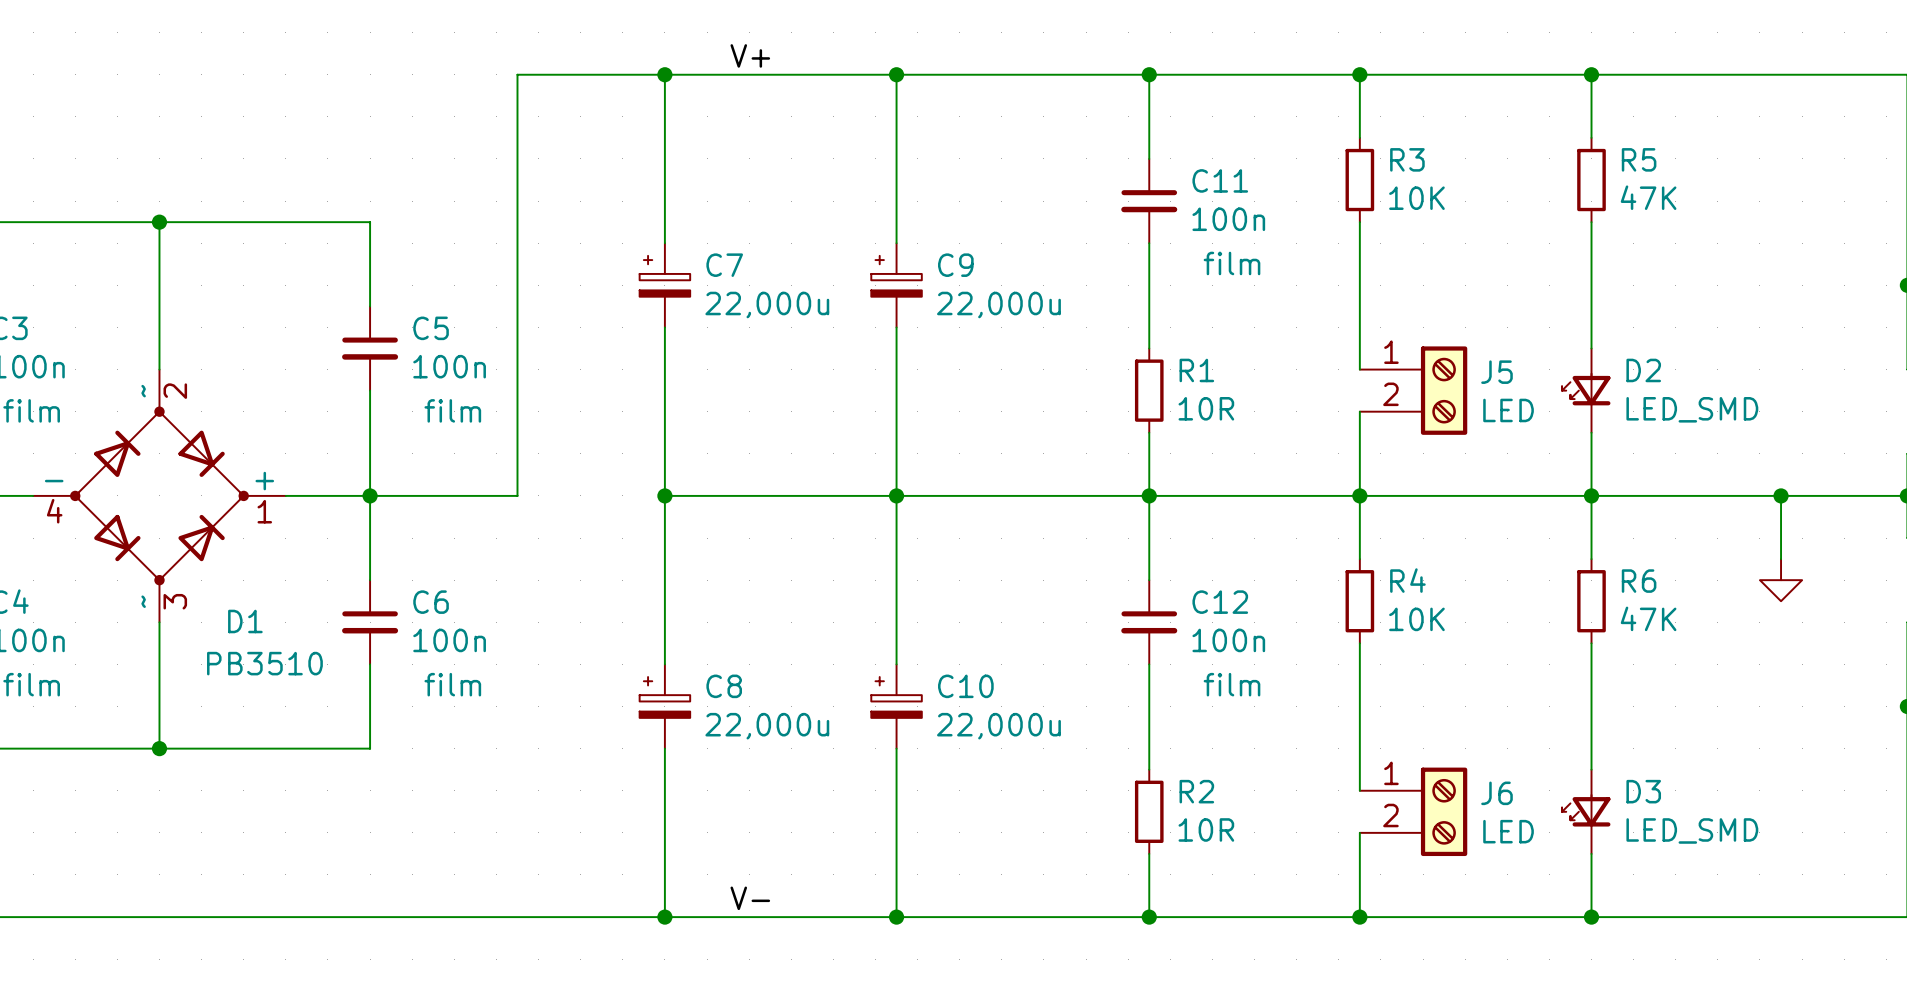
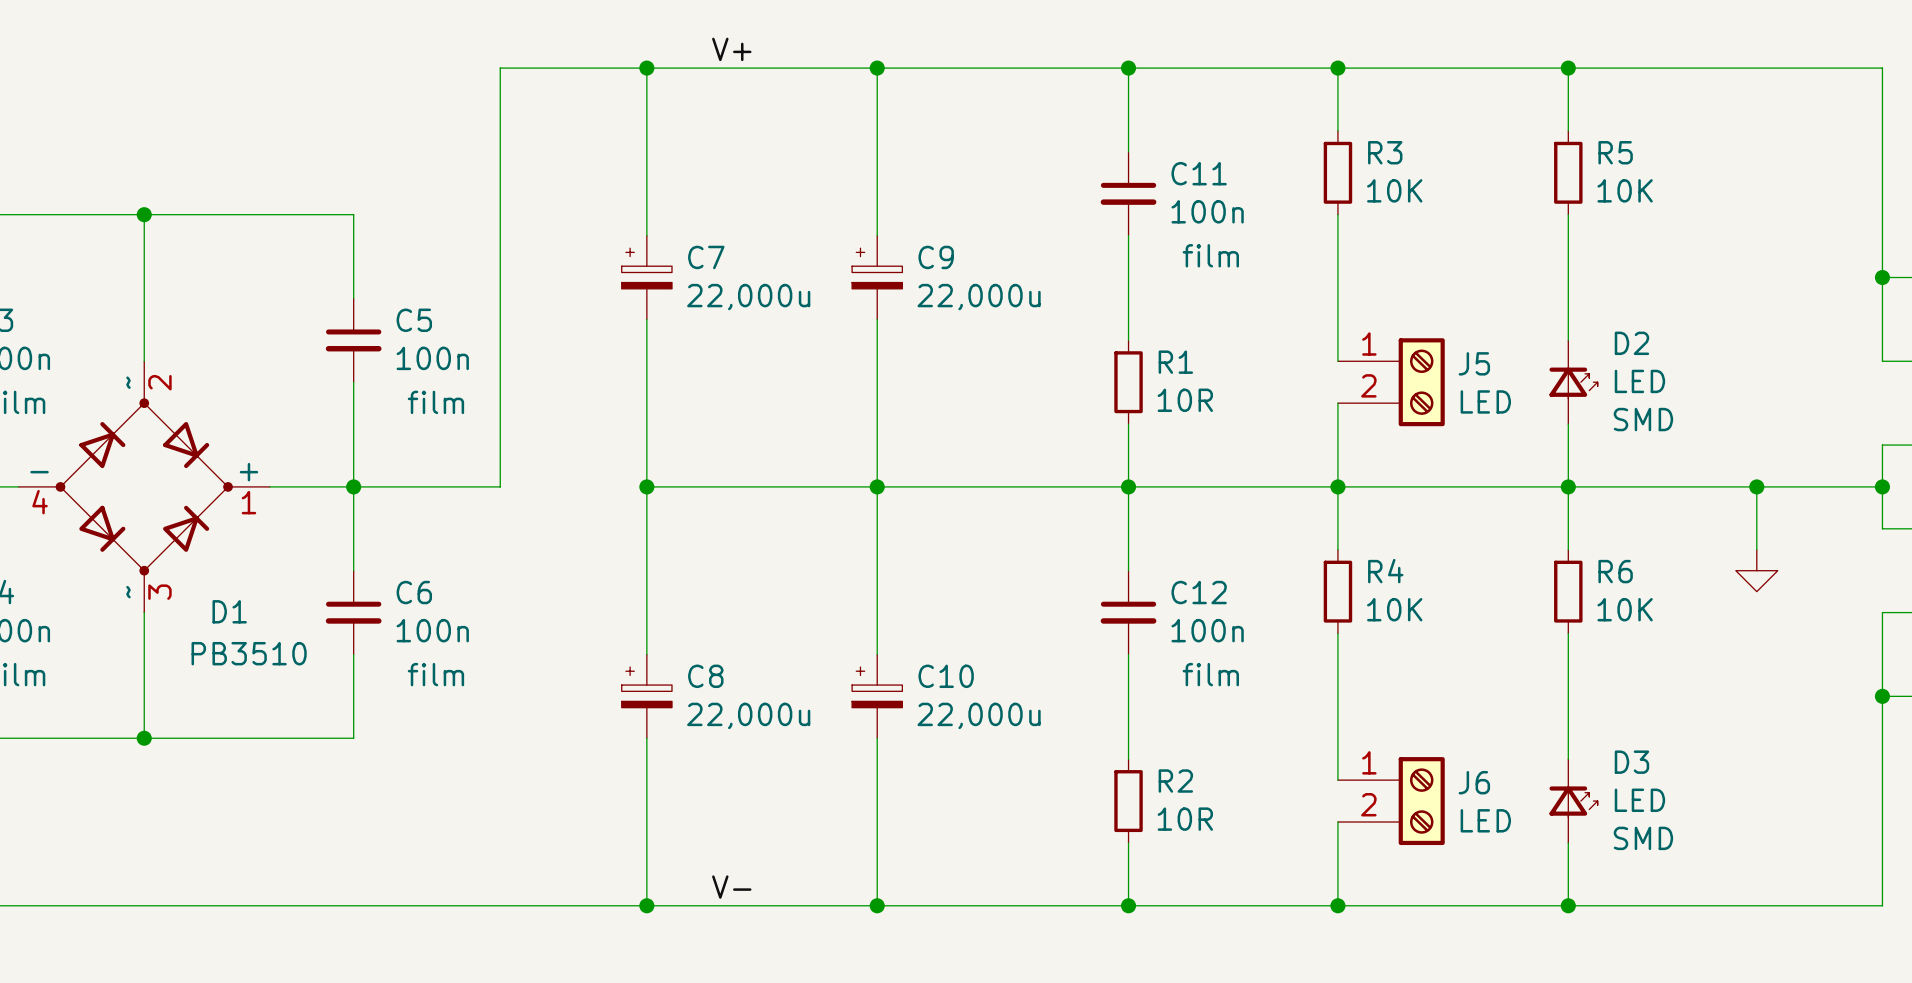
R5 value: 47K (1648, 197) -> 10K (1625, 190)
D2 rotation: 0° (1586, 389) -> 180° (1573, 383)
D2 value: LED_SMD (1692, 409) -> LED (1639, 381)
D2 text: none -> SMD (1643, 419)
R6 value: 47K (1648, 618) -> 10K (1625, 609)
D3 rotation: 0° (1586, 810) -> 180° (1573, 802)
D3 value: LED_SMD (1692, 830) -> LED (1639, 800)
D3 text: none -> SMD (1643, 838)

